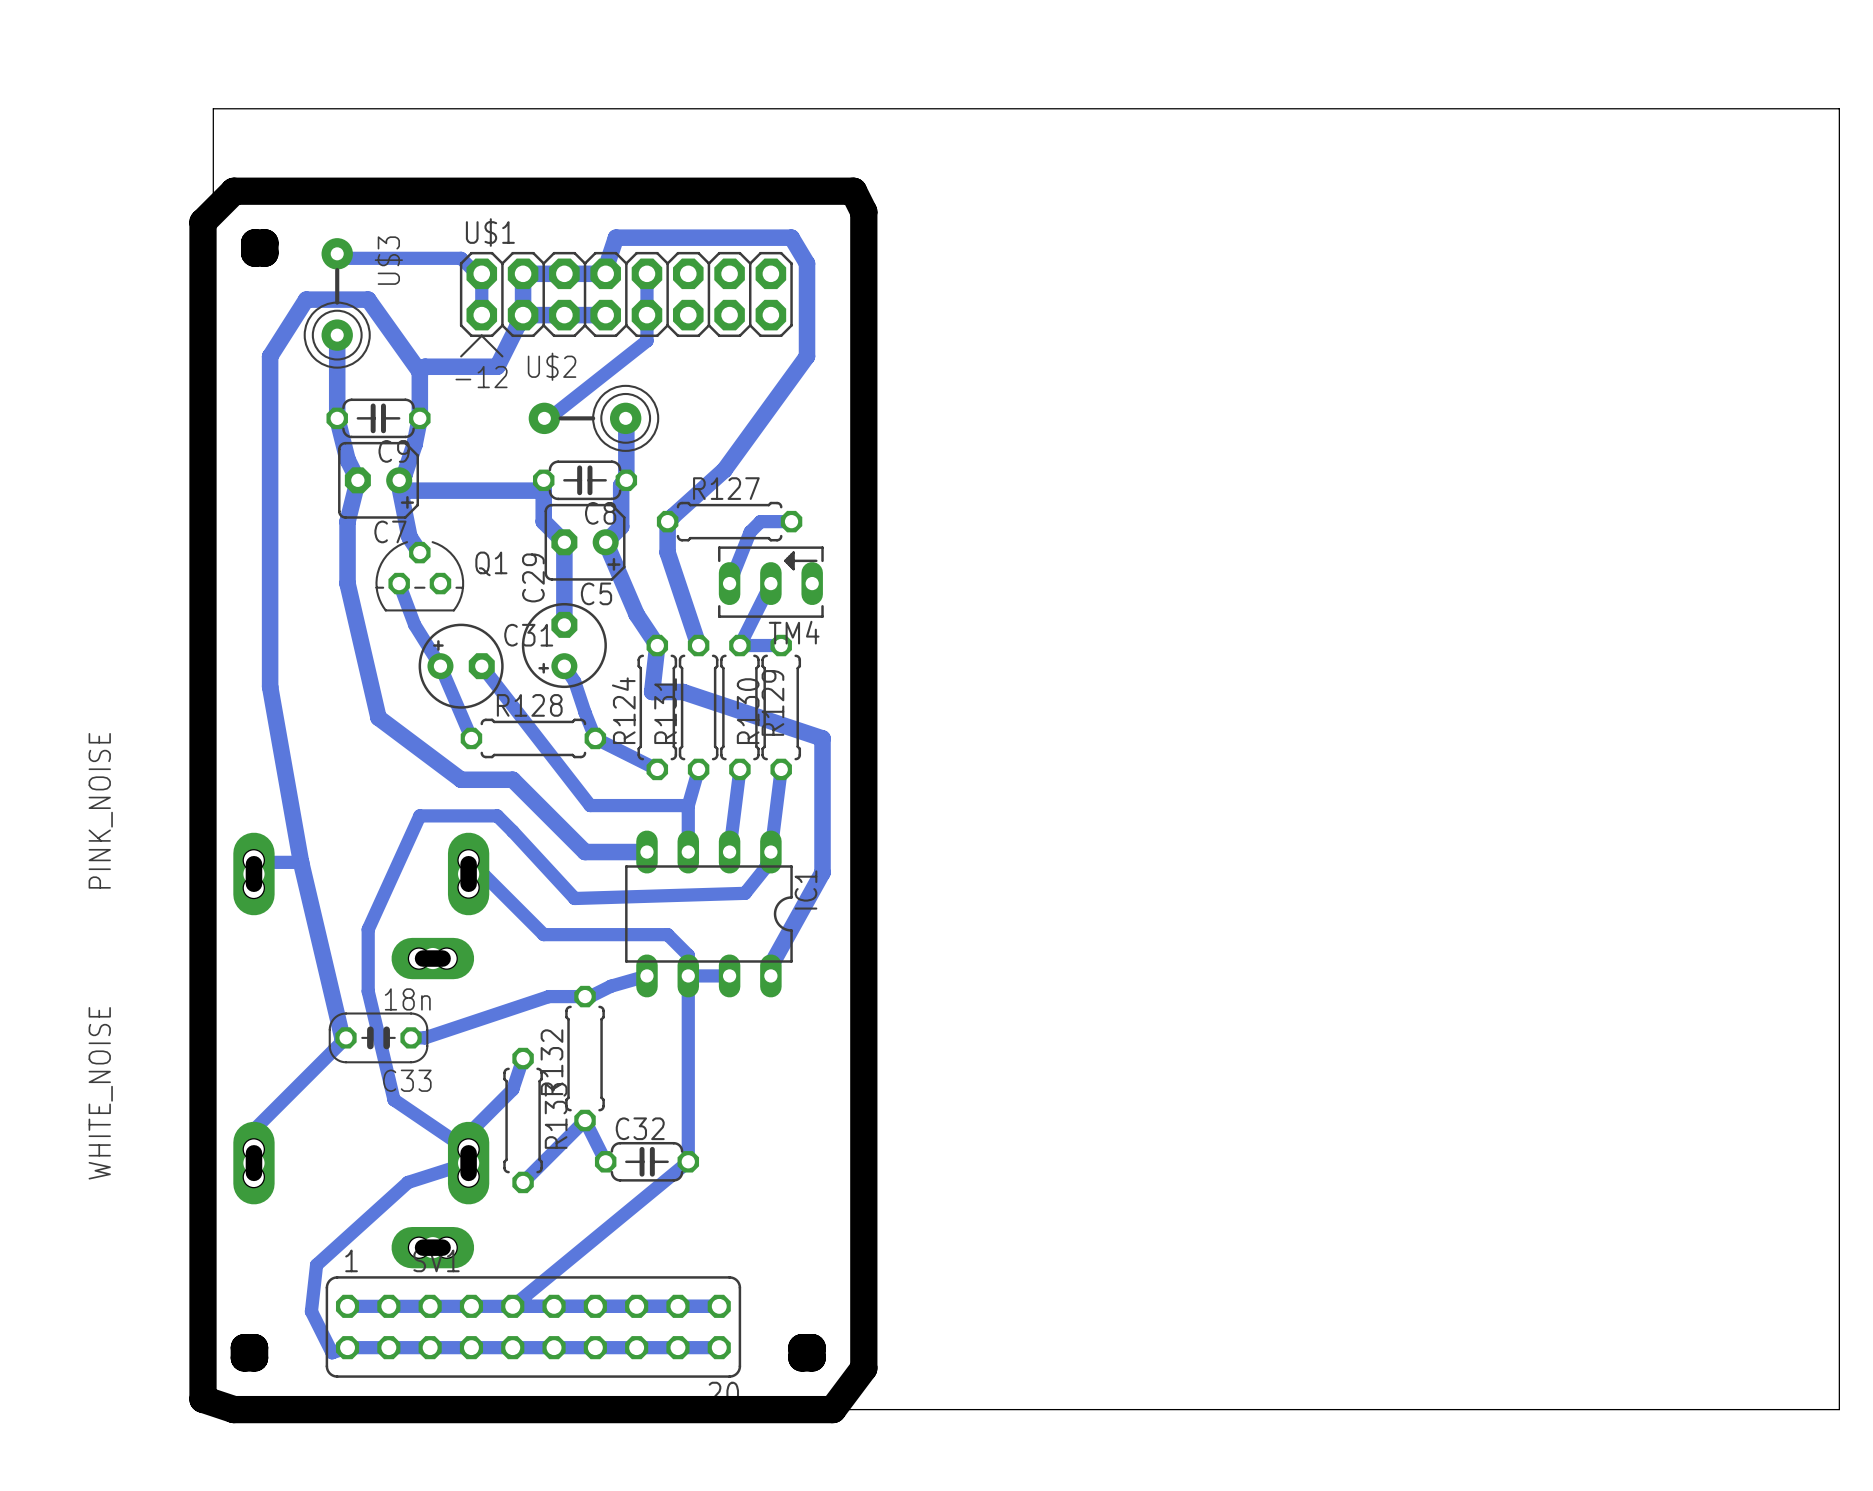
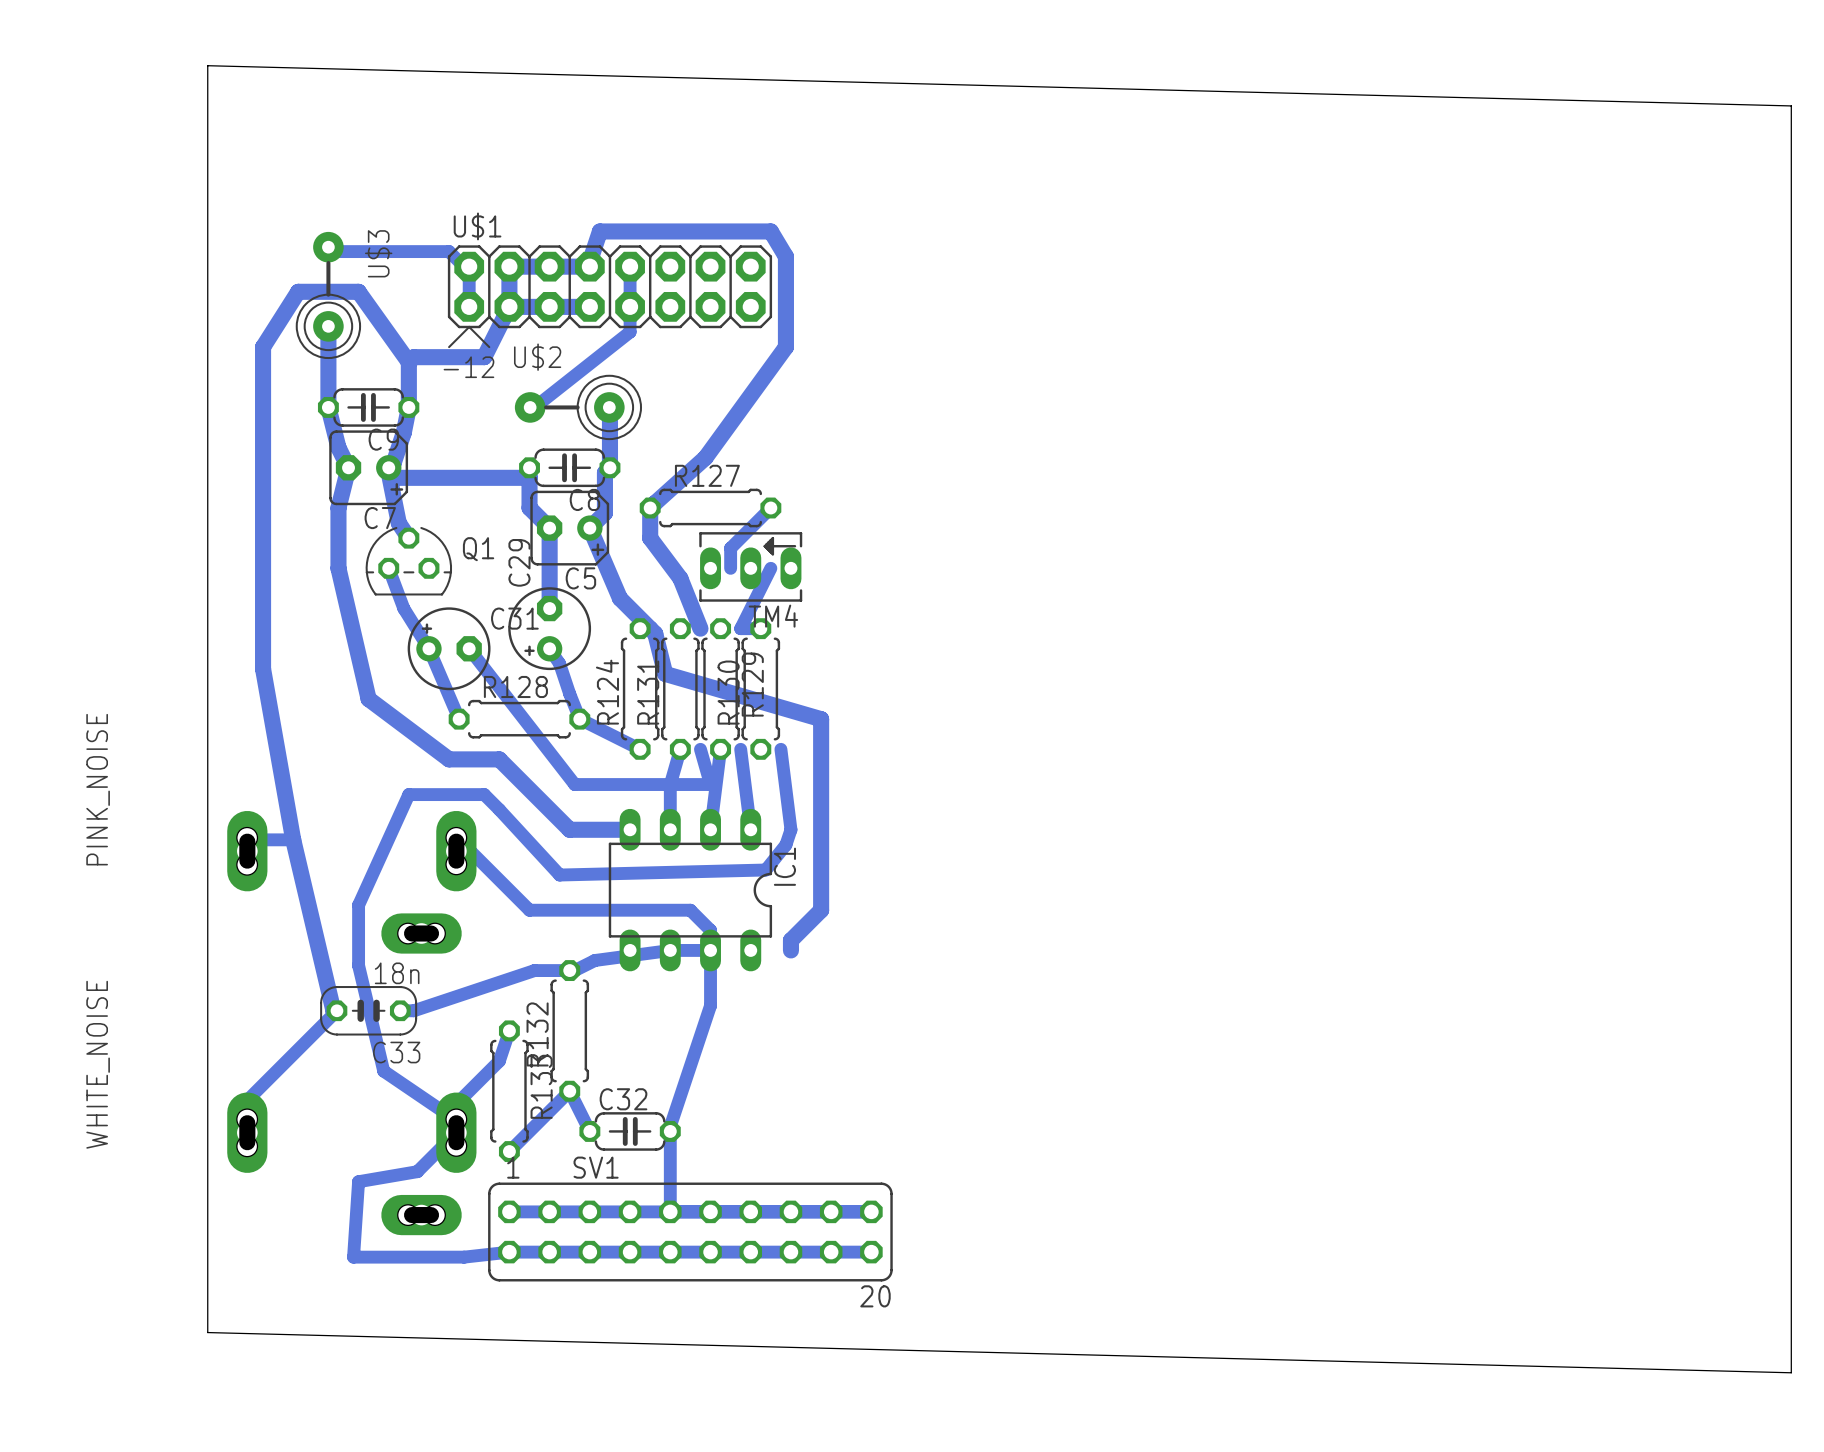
board edge: (213, 108) (1839, 108) -> (207, 105) (207, 65) (1791, 105)
board edge: (233, 191) (853, 191) (863, 211) (863, 1368) (832, 1409) (233, 1409) (202, 1399) (202, 222) (233, 191) -> none
board edge: (254, 242) (254, 253) (264, 253) (264, 242) (254, 242) -> none
bottom track: (791, 521) (760, 521) (750, 531) (729, 583) -> (770, 508) (730, 548) (730, 568)
bottom track: (667, 552) (698, 645) -> (650, 538) (680, 578) (700, 628)
bottom track: (770, 583) (739, 645) (760, 645) -> (770, 568) (740, 628)
bottom track: (636, 614) (657, 645) (652, 691) (683, 691) (822, 738) (822, 872) (770, 965) (770, 975) -> (620, 598) (655, 633) (665, 673) (821, 719) (821, 910) (790, 940) (790, 950)
bottom track: none -> (700, 749) (710, 784) (670, 784)
bottom track: none -> (740, 749) (750, 829)
bottom track: (781, 769) (770, 852) (765, 867) (745, 893) (574, 898) -> (780, 749) (790, 829) (785, 844) (765, 870) (559, 875)
bottom track: (667, 934) (688, 955) (688, 1156) -> (650, 910) (690, 910) (710, 930) (710, 1005) (670, 1126)
bottom track: (646, 975) (610, 986) -> (670, 950) (594, 960)
bottom track: (688, 1161) (512, 1306) -> (670, 1131) (670, 1211)
bottom track: (468, 1163) (407, 1182) (316, 1265) (311, 1311) (332, 1352) (347, 1347) (719, 1347) -> (456, 1132) (417, 1171) (358, 1181) (353, 1257) (464, 1257) (509, 1252) (871, 1252)
bottom track: (347, 1306) (719, 1306) -> (509, 1211) (871, 1211)
SV1 position: (533, 1327) -> (690, 1232)
board edge: (244, 1347) (254, 1347) (254, 1357) (244, 1357) (244, 1347) -> none
board edge: (801, 1347) (801, 1357) (812, 1357) (812, 1347) (801, 1347) -> none
board edge: (213, 1368) (213, 1409) (1839, 1409) -> (207, 1332) (1791, 1372)

